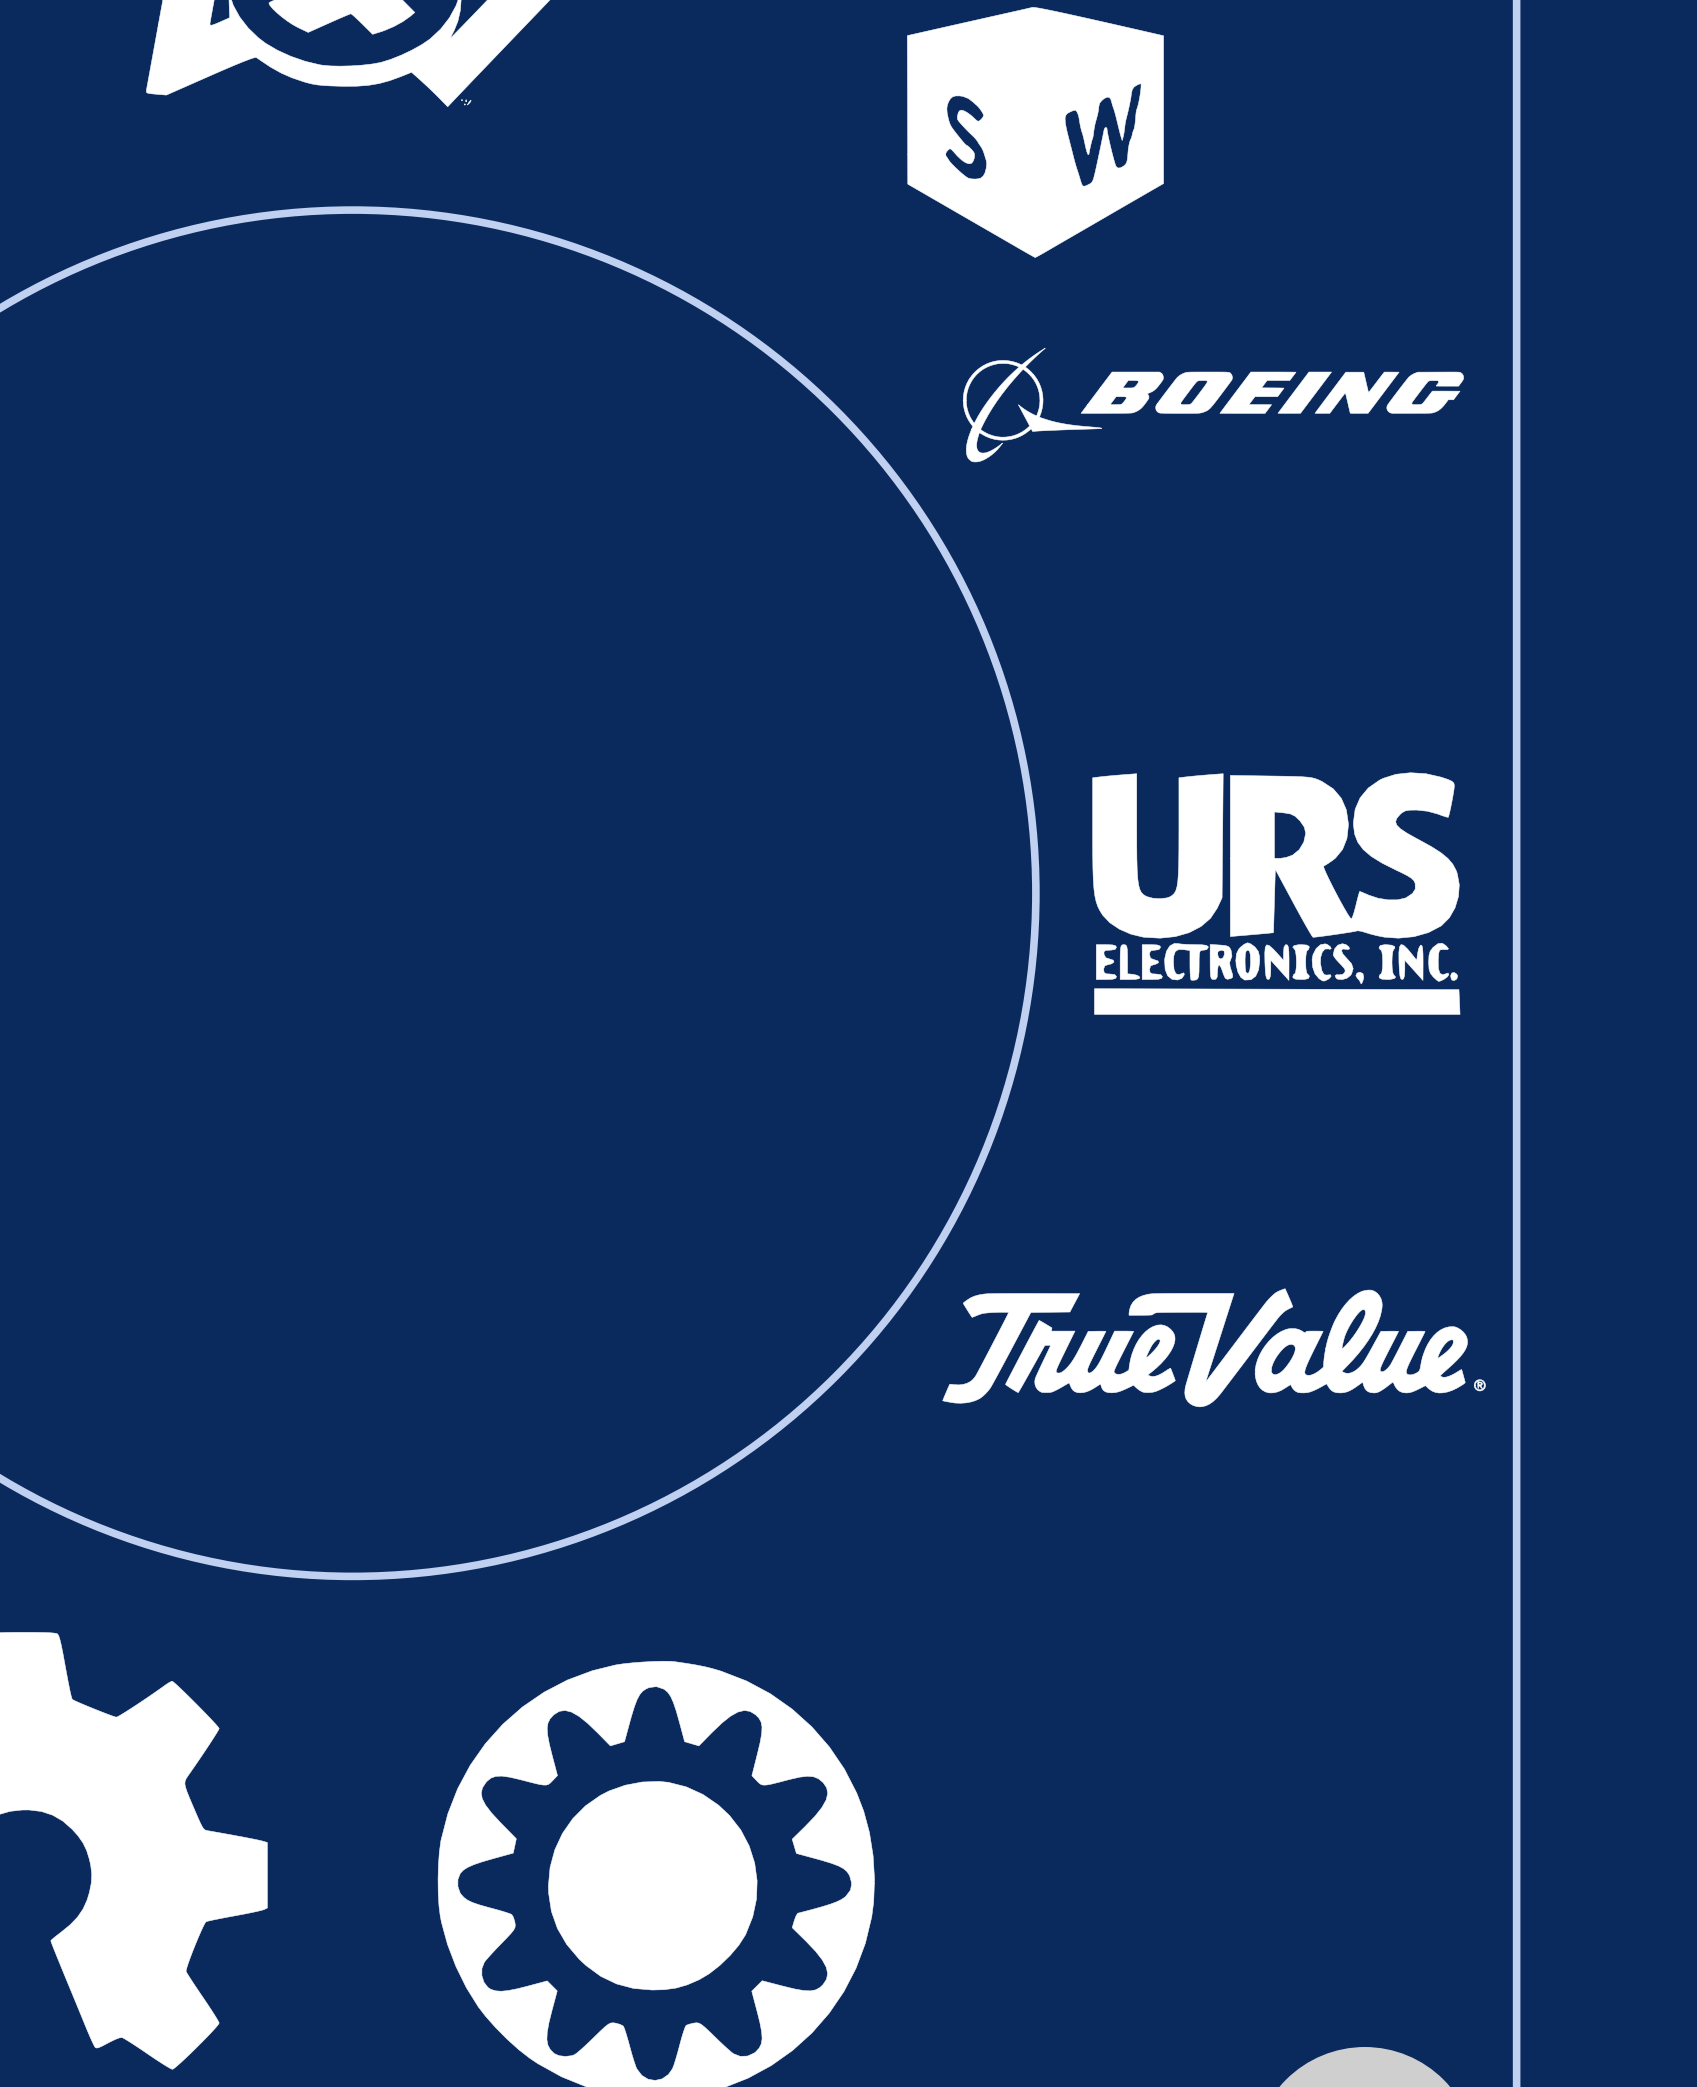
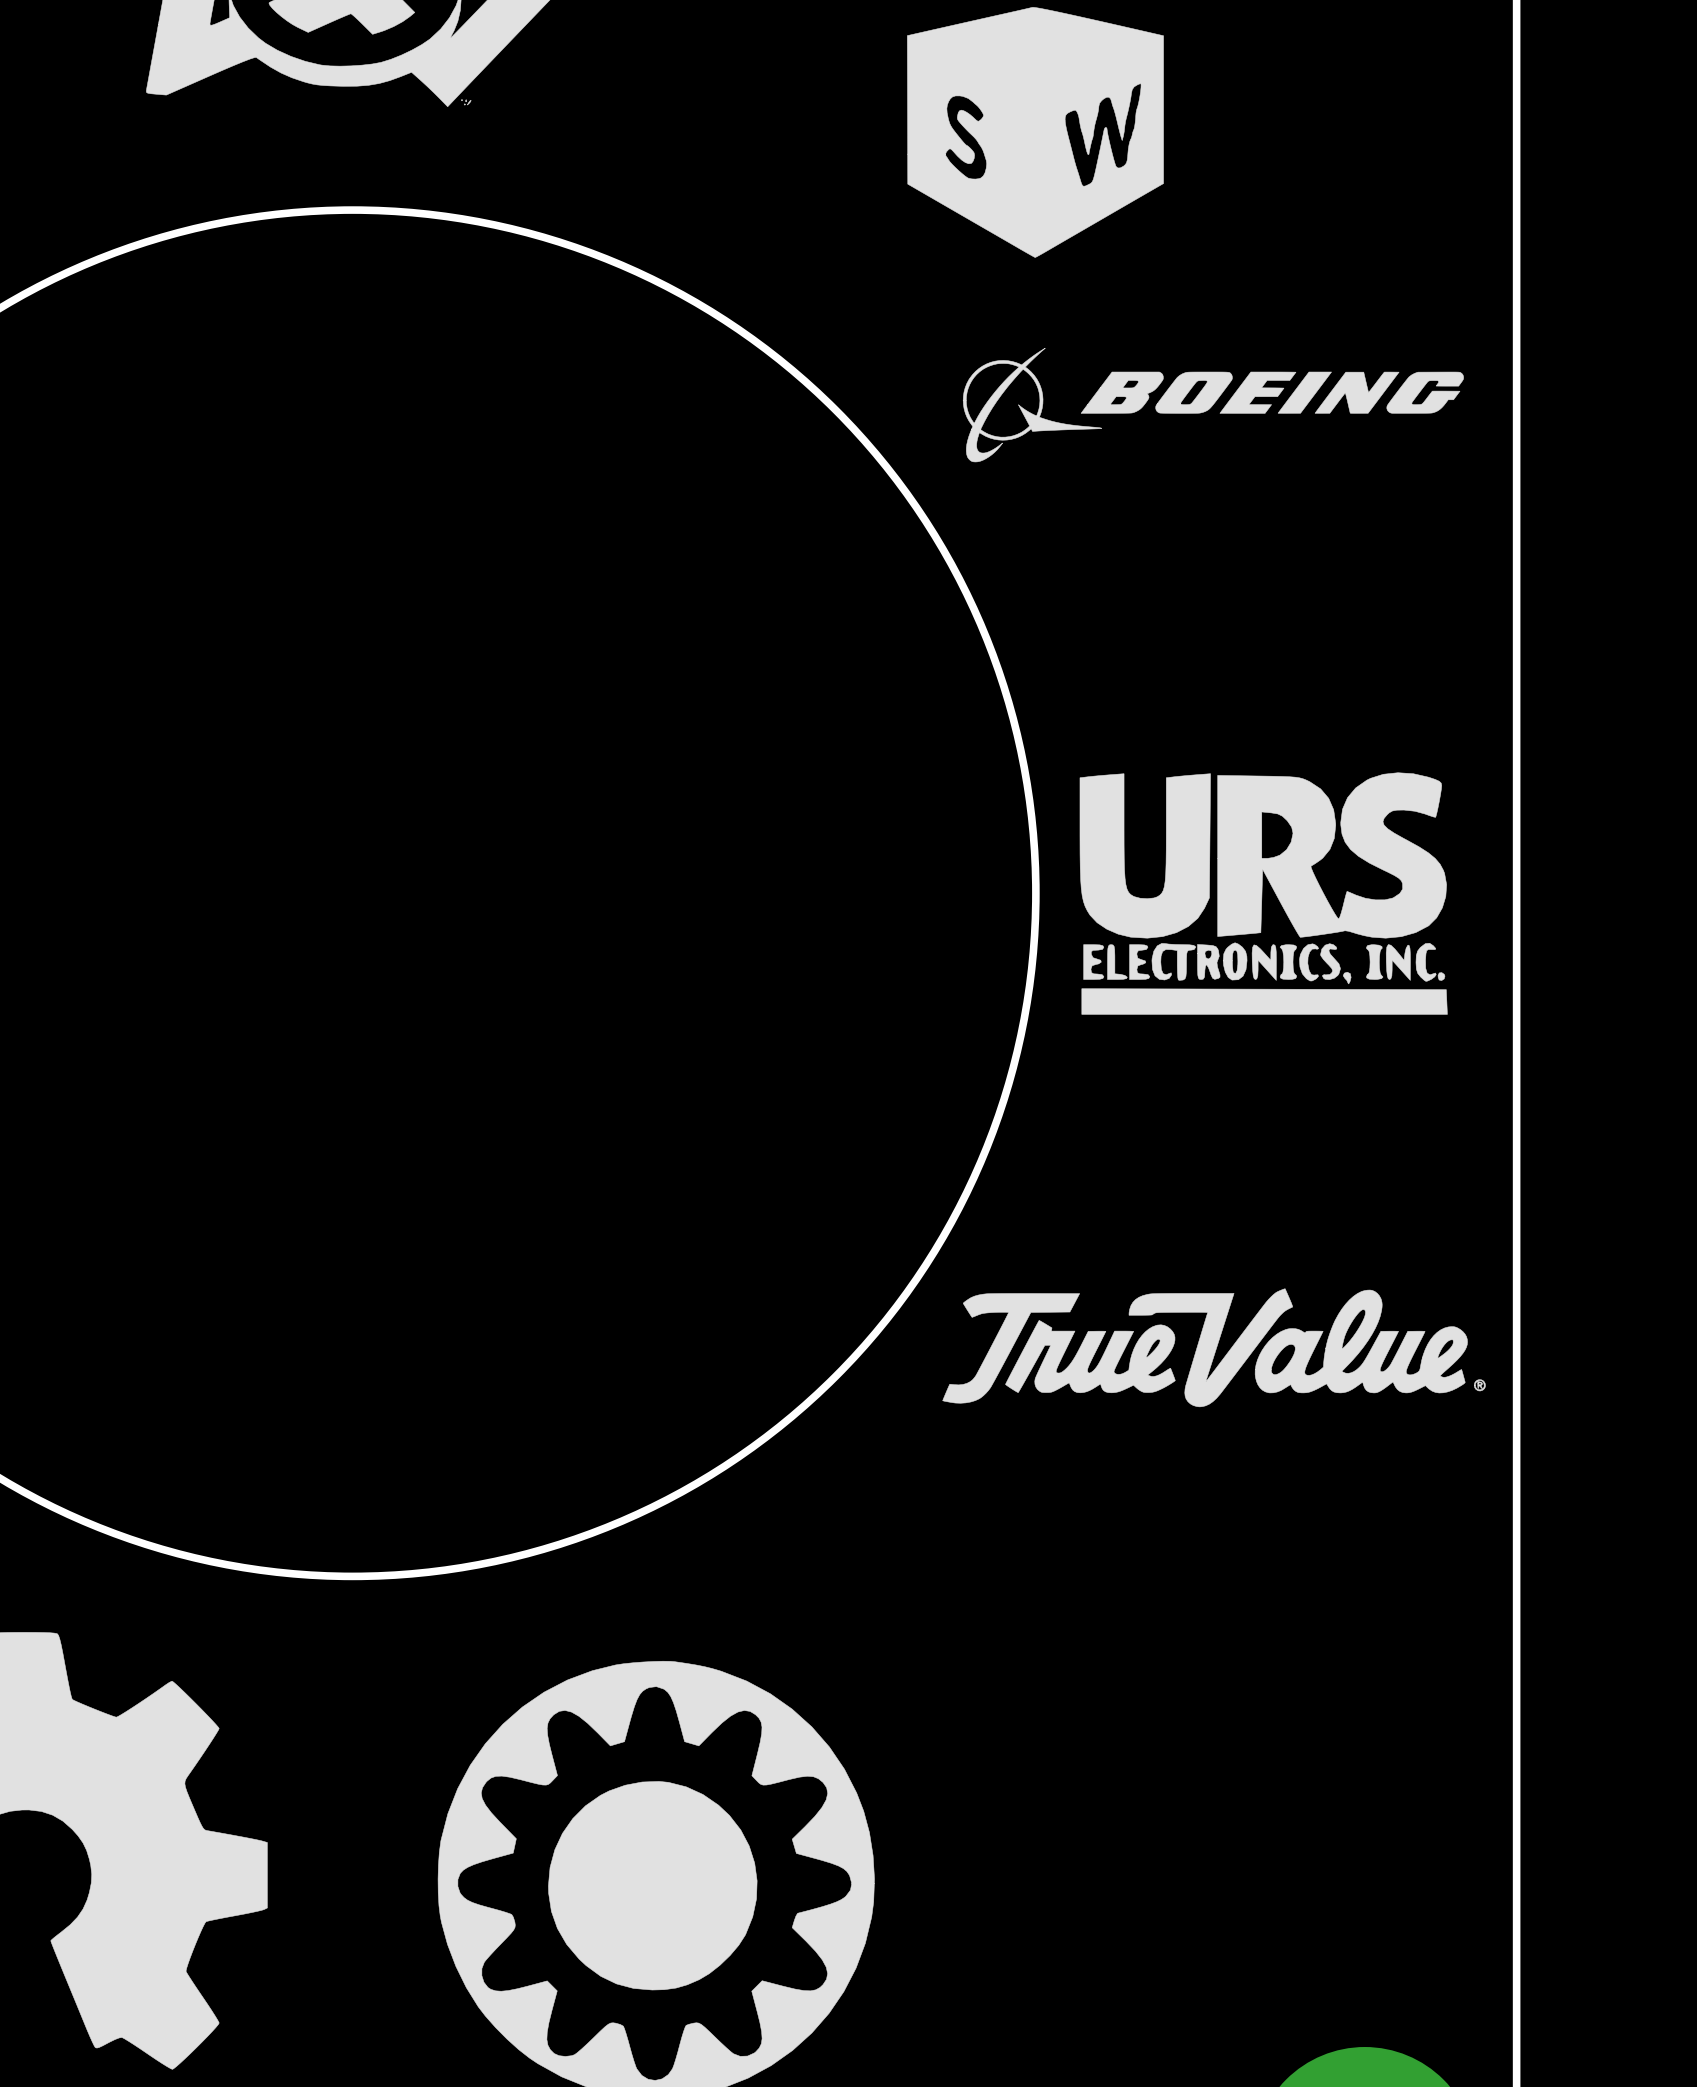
drawing position: (1276, 893) -> (1263, 893)

